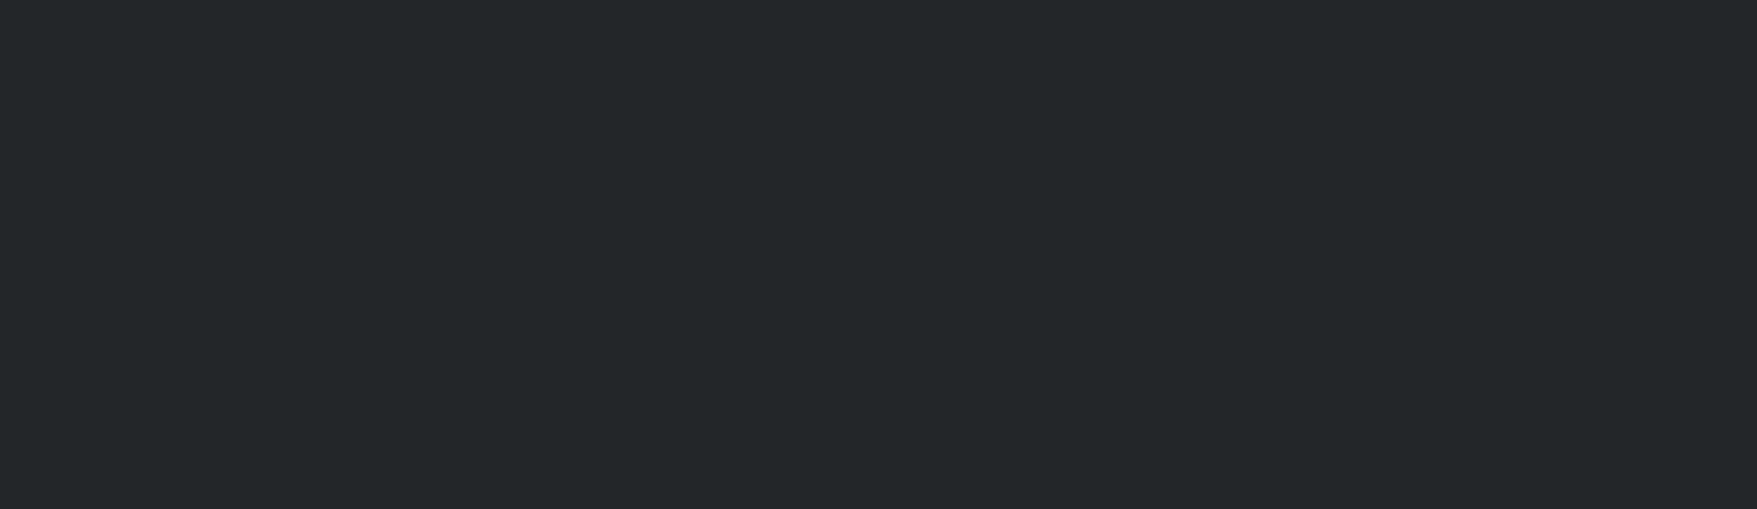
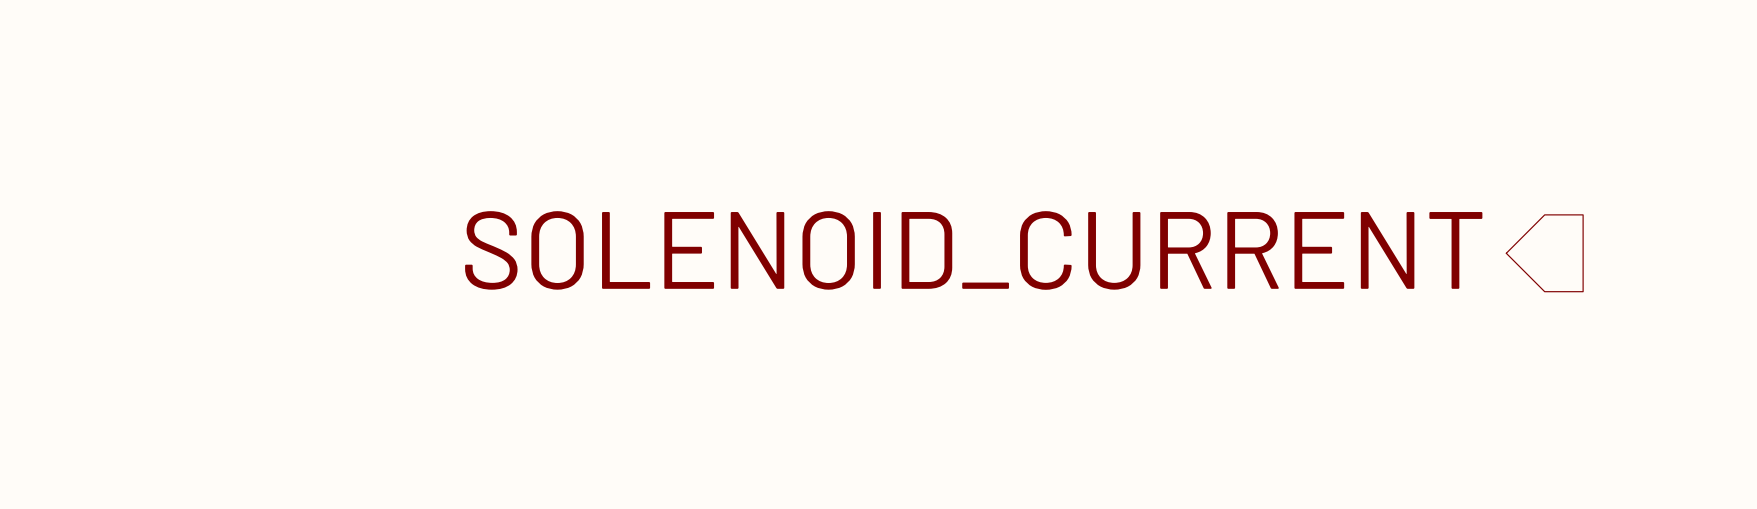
hierarchical label: none -> SOLENOID_CURRENT (973, 250)

